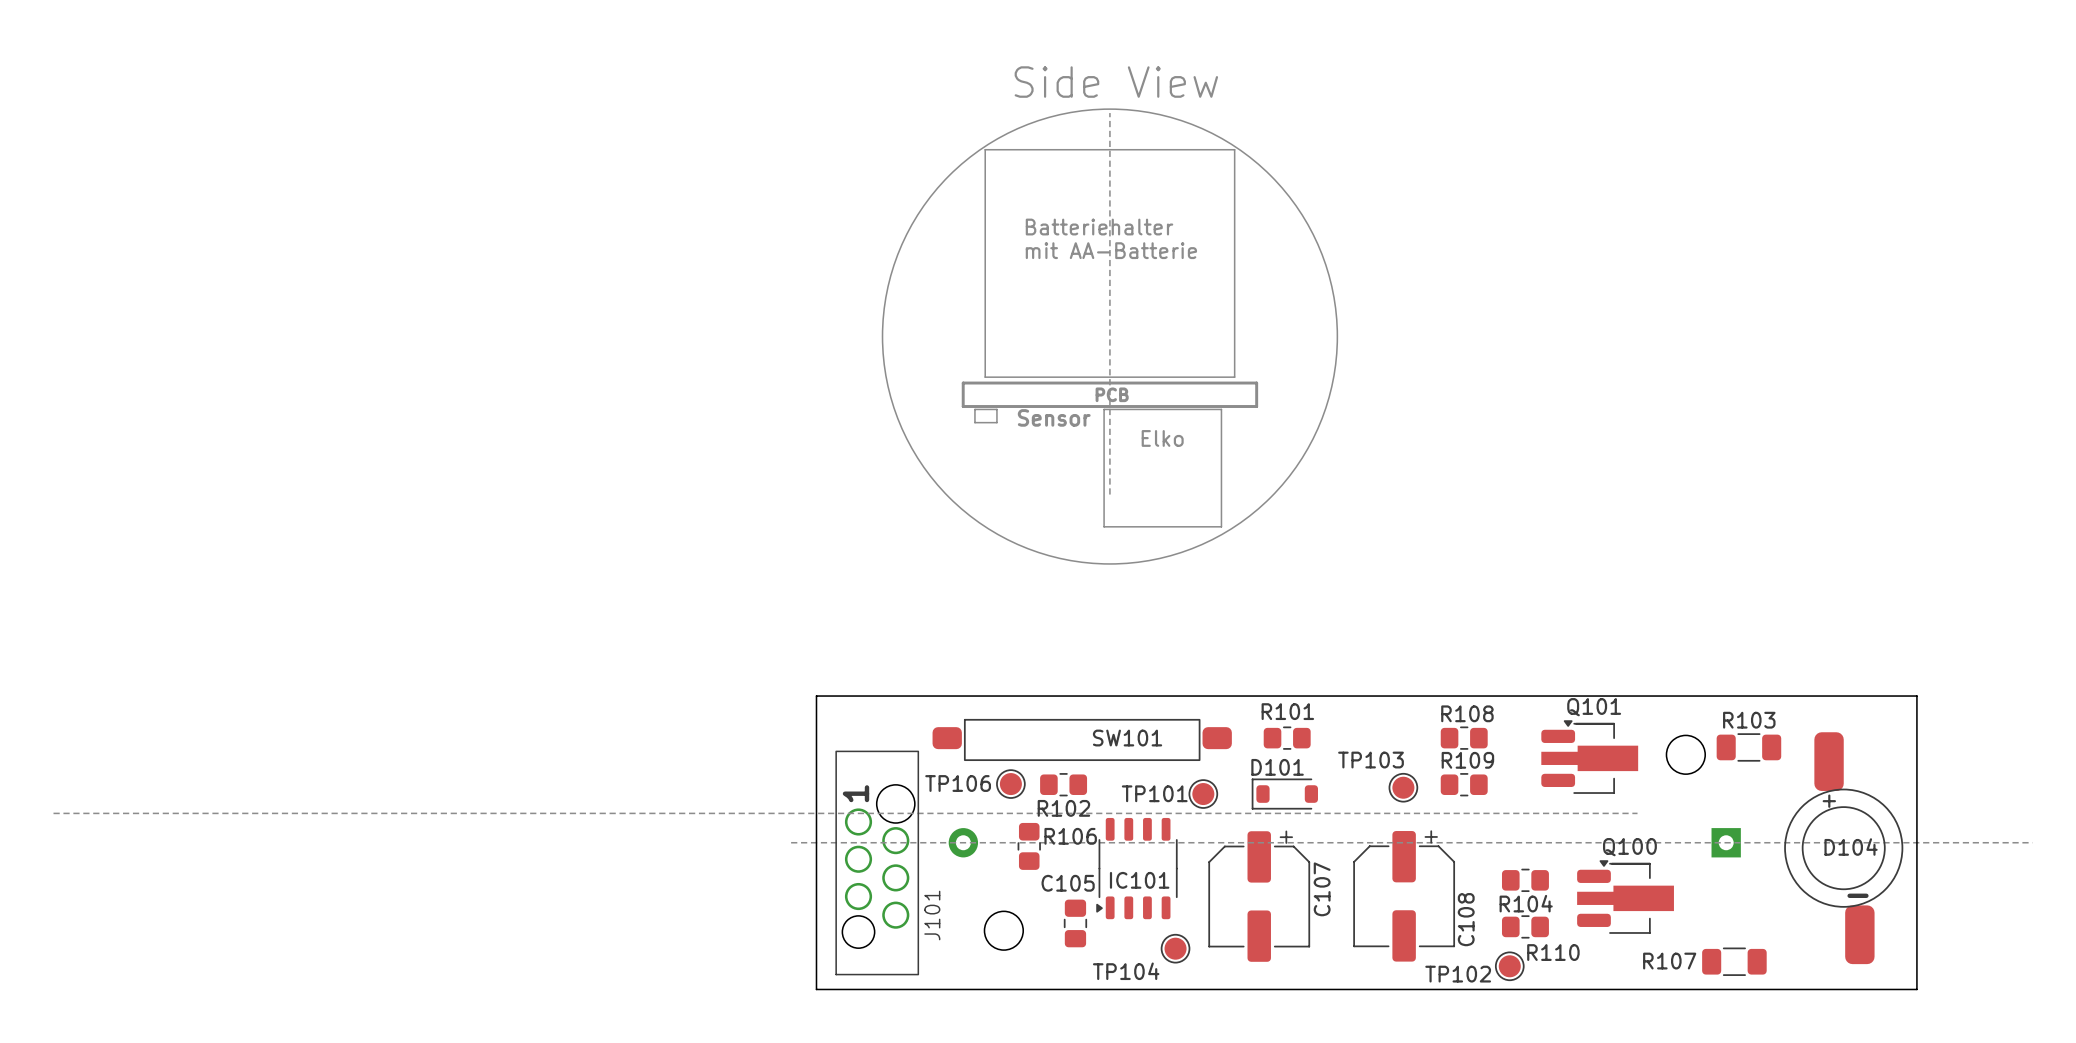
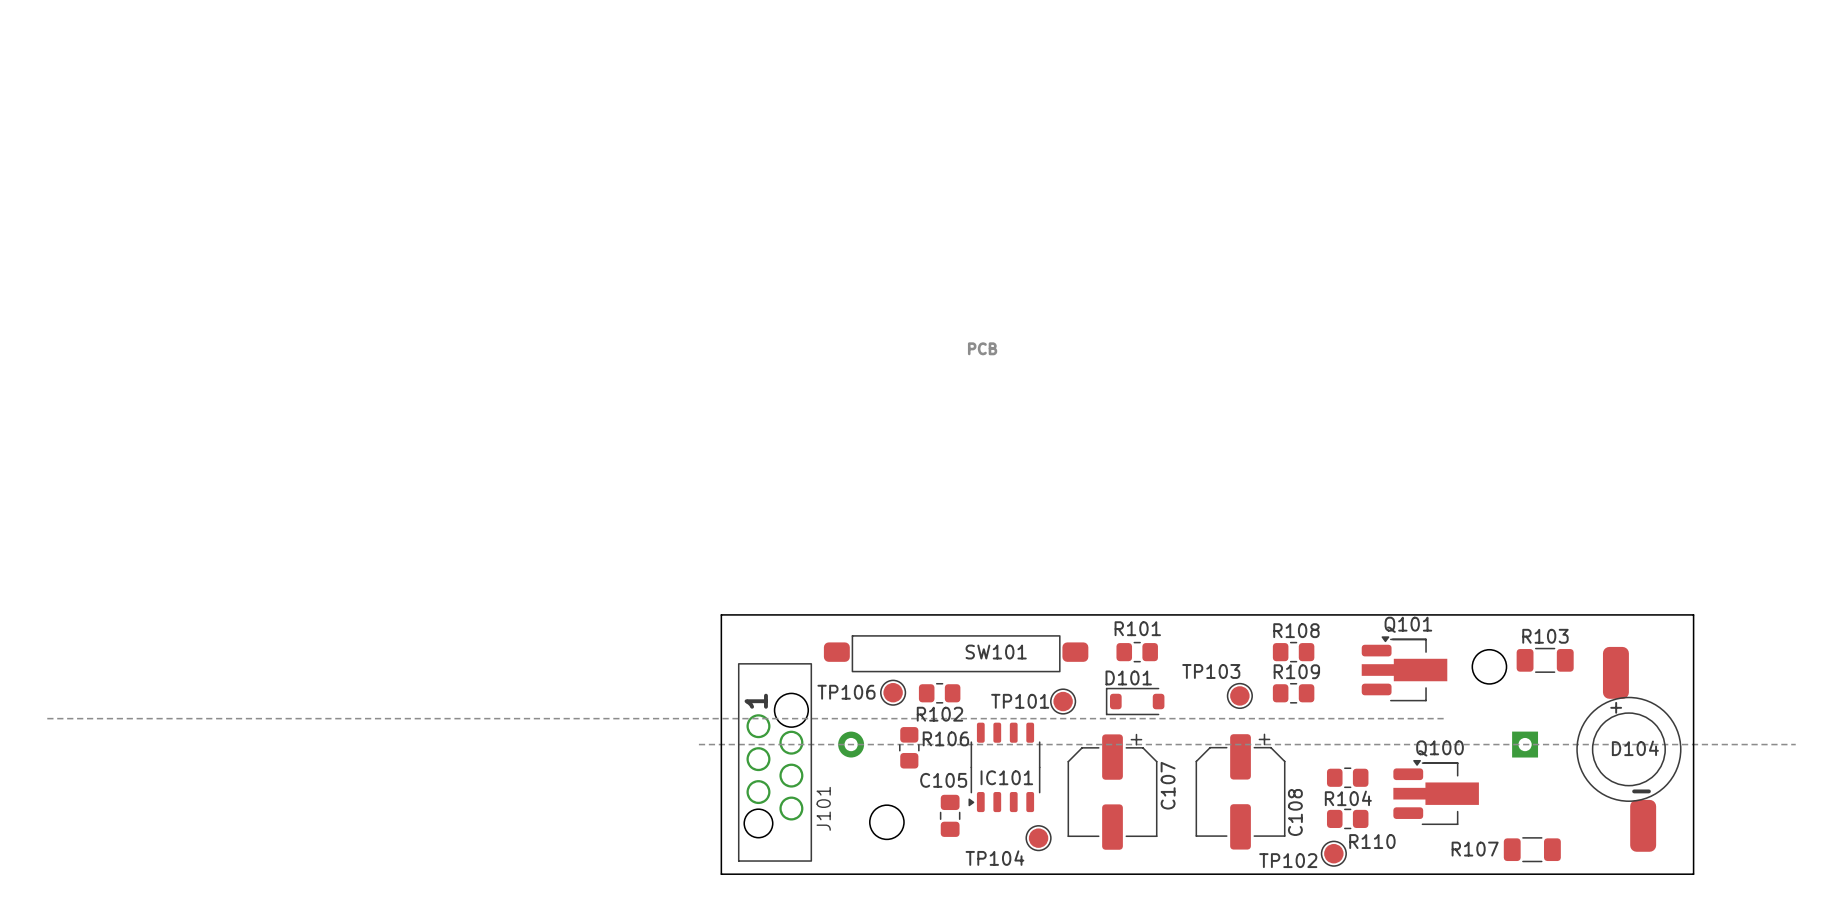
text: Side View (1116, 82) -> none
drawing: [881, 108, 1339, 565] -> none
line: (1109, 113) (1109, 494) -> none
line: (985, 149) (1234, 149) (1234, 377) (985, 377) (985, 149) -> none
text: Batteriehalter (1099, 227) -> none
text: mit AA-Batterie (1111, 250) -> none
line: (963, 383) (1256, 383) (1256, 406) (963, 406) (963, 383) -> none
line: (974, 409) (996, 409) (996, 422) (974, 422) (974, 409) -> none
line: (1104, 409) (1221, 409) (1221, 526) (1104, 526) (1104, 409) -> none
text: Sensor (1054, 417) -> none
text: Elko (1162, 438) -> none

